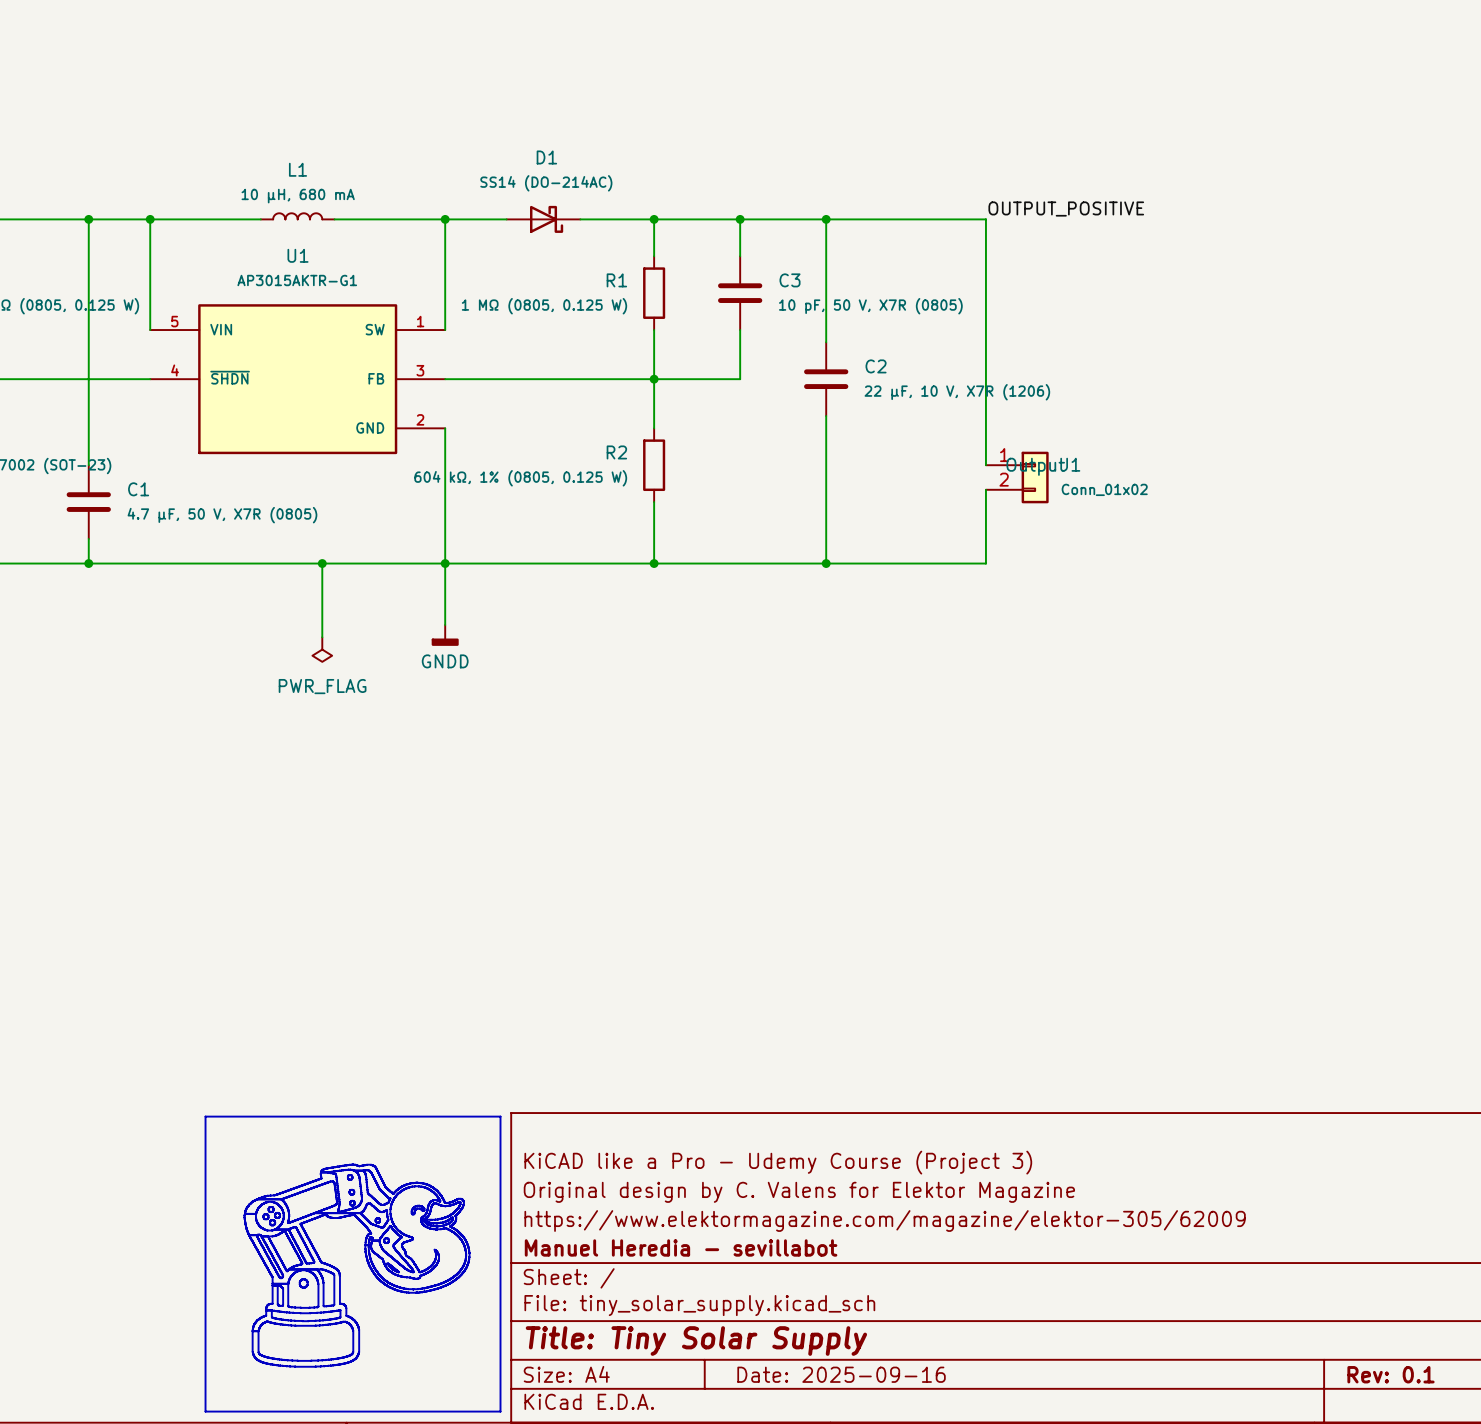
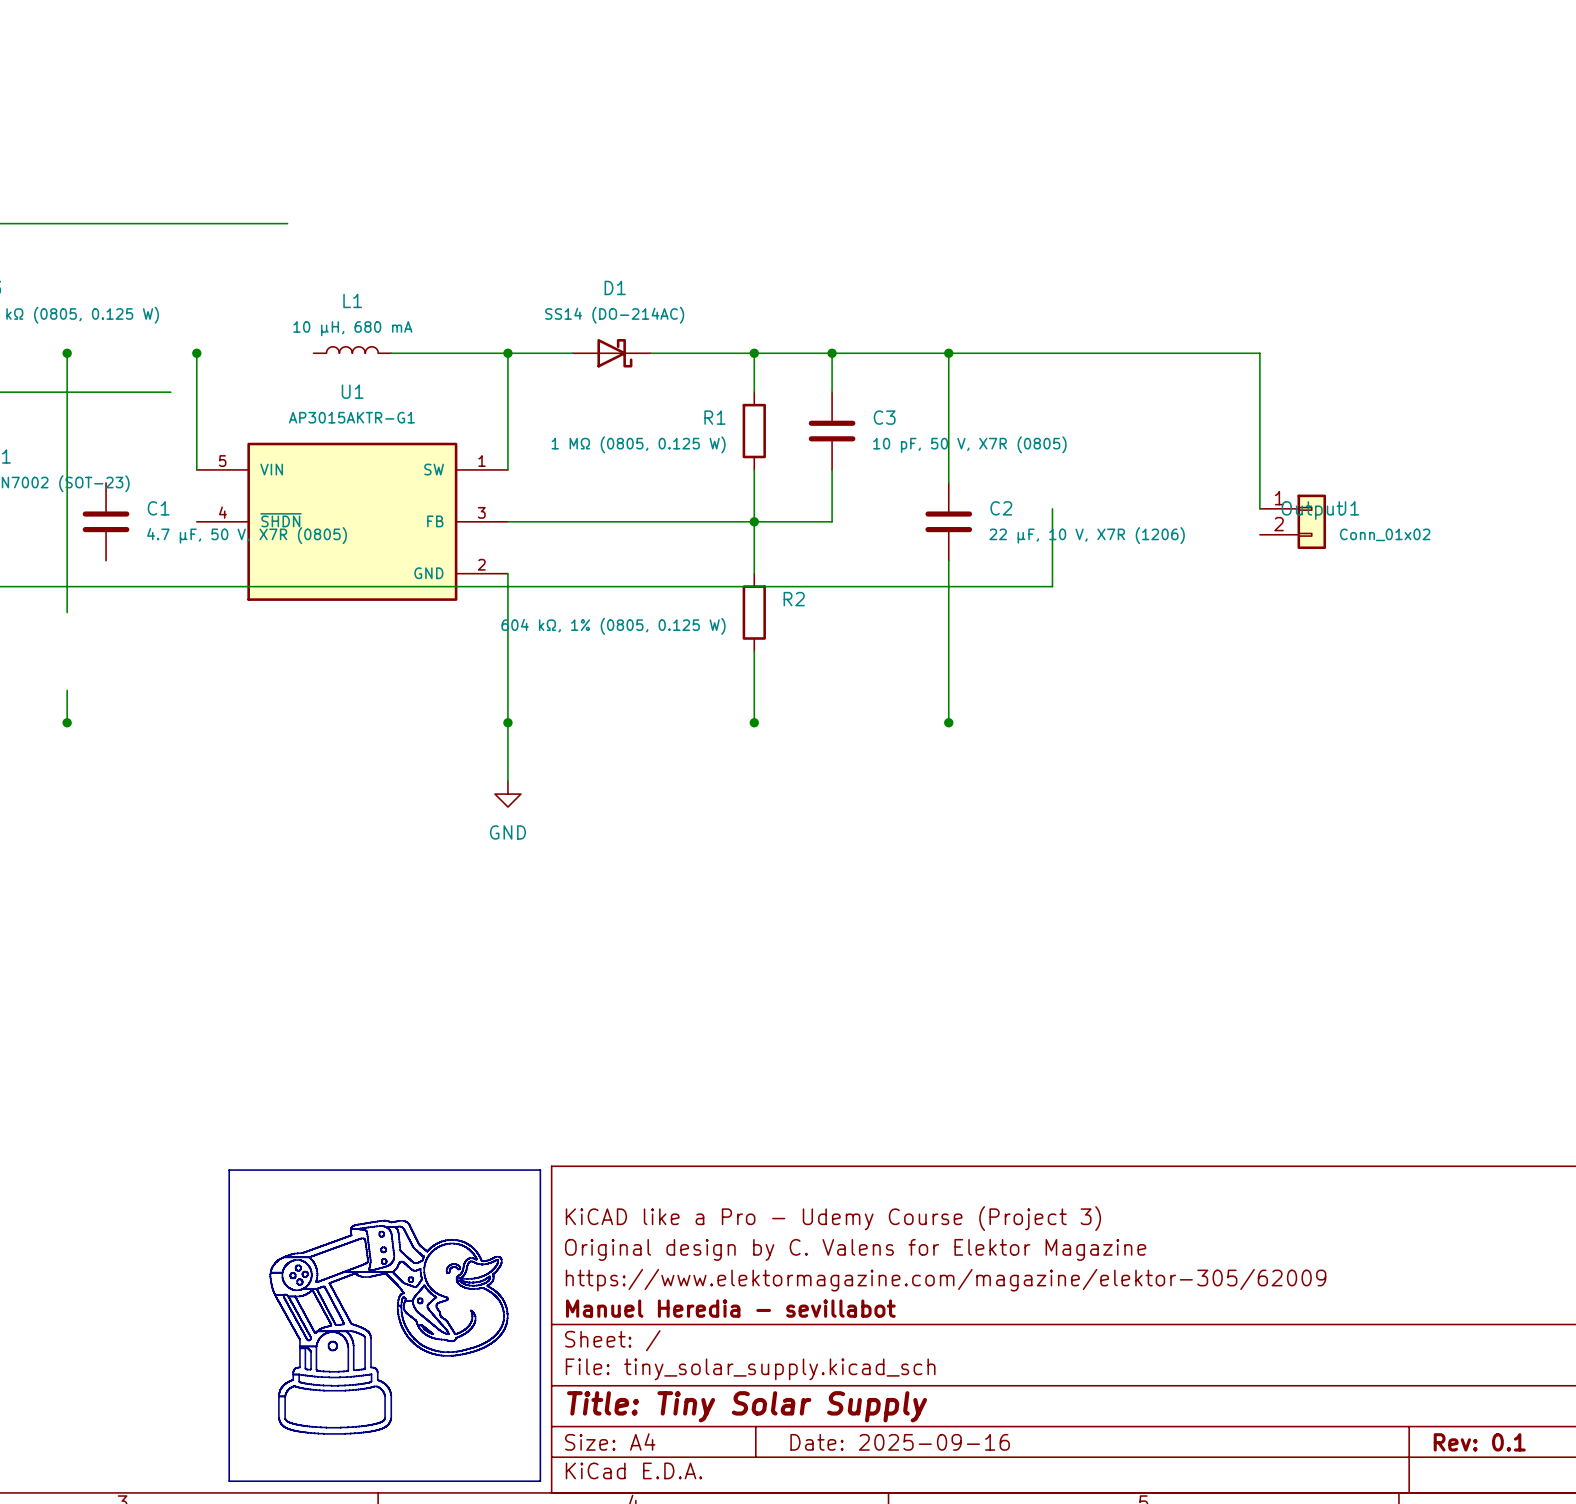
label: OUTPUT_POSITIVE (1066, 209) -> none
L1 position: (297, 216) -> (352, 350)
wire: (88, 219) (88, 465) -> (67, 353) (67, 612)
junction: (88, 219) -> none
wire: (150, 219) (150, 330) -> (196, 353) (196, 469)
junction: (150, 219) -> none
wire: (334, 219) (506, 219) -> (391, 353) (572, 353)
wire: (445, 219) (445, 330) -> (507, 353) (507, 469)
junction: (445, 219) -> none
D1 position: (543, 219) -> (611, 353)
wire: (580, 219) (985, 219) (985, 465) -> none
wire: (654, 219) (654, 256) -> (832, 353) (832, 392)
junction: (654, 219) -> none
wire: (740, 219) (740, 256) -> (754, 353) (754, 392)
junction: (740, 219) -> none
wire: (826, 219) (826, 342) -> (948, 353) (948, 482)
junction: (826, 219) -> none
R1 position: (654, 293) -> (754, 431)
C3 position: (740, 293) -> (832, 431)
wire: (654, 330) (654, 428) -> (754, 469) (754, 573)
wire: (740, 330) (740, 379) (445, 379) -> none
junction: none -> (67, 353)
junction: none -> (196, 353)
junction: none -> (507, 353)
wire: none -> (650, 353) (1259, 353) (1259, 508)
junction: none -> (754, 353)
junction: none -> (832, 353)
junction: none -> (948, 353)
U1 position: (297, 379) -> (352, 521)
junction: (654, 379) -> none
C2 position: (826, 379) -> (948, 521)
wire: (826, 416) (826, 563) -> none
wire: (445, 428) (445, 624) -> (507, 573) (507, 781)
R2 name position: R2 (616, 452) -> R2 (794, 599)
wire: none -> (832, 469) (832, 521) (507, 521)
R2 position: (654, 465) -> (754, 612)
J1 position: (1017, 477) -> (1292, 521)
wire: (654, 502) (654, 563) -> none
junction: none -> (754, 521)
wire: (88, 538) (88, 563) -> none
wire: none -> (948, 560) (948, 722)
junction: (88, 563) -> none
wire: (322, 563) (322, 637) -> none
junction: (322, 563) -> none
junction: (445, 563) -> none
junction: (654, 563) -> none
junction: (826, 563) -> none
wire: none -> (754, 651) (754, 722)
power symbol: GNDD (445, 635) -> none
power symbol: PWR_FLAG (322, 649) -> none
wire: none -> (67, 690) (67, 722)
junction: none -> (67, 722)
junction: none -> (507, 722)
junction: none -> (754, 722)
junction: none -> (948, 722)
power symbol: none -> GND (507, 794)

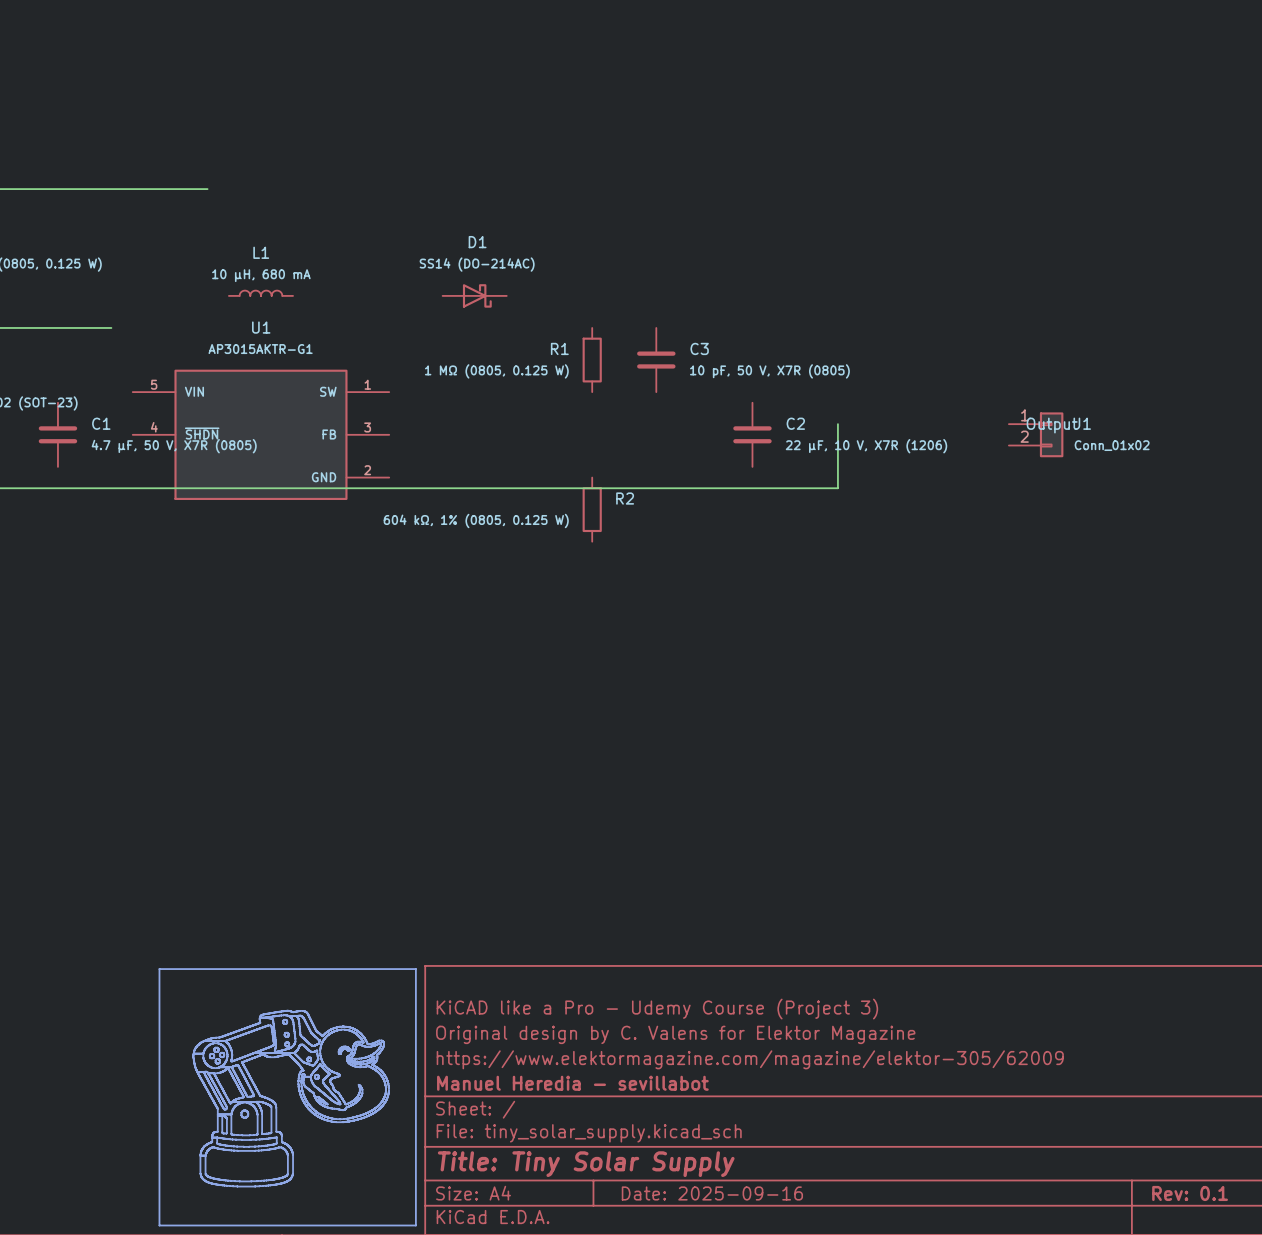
wire: (67, 353) (67, 612) -> none
junction: (67, 353) -> none
wire: (196, 353) (196, 469) -> none
junction: (196, 353) -> none
wire: (391, 353) (572, 353) -> none
wire: (507, 353) (507, 469) -> none
junction: (507, 353) -> none
wire: (650, 353) (1259, 353) (1259, 508) -> none
wire: (754, 353) (754, 392) -> none
junction: (754, 353) -> none
wire: (832, 353) (832, 392) -> none
junction: (832, 353) -> none
wire: (948, 353) (948, 482) -> none
junction: (948, 353) -> none
wire: (754, 469) (754, 573) -> none
wire: (832, 469) (832, 521) (507, 521) -> none
junction: (754, 521) -> none
wire: (948, 560) (948, 722) -> none
wire: (507, 573) (507, 781) -> none
wire: (754, 651) (754, 722) -> none
wire: (67, 690) (67, 722) -> none
junction: (67, 722) -> none
junction: (507, 722) -> none
junction: (754, 722) -> none
junction: (948, 722) -> none
power symbol: GND (507, 794) -> none

